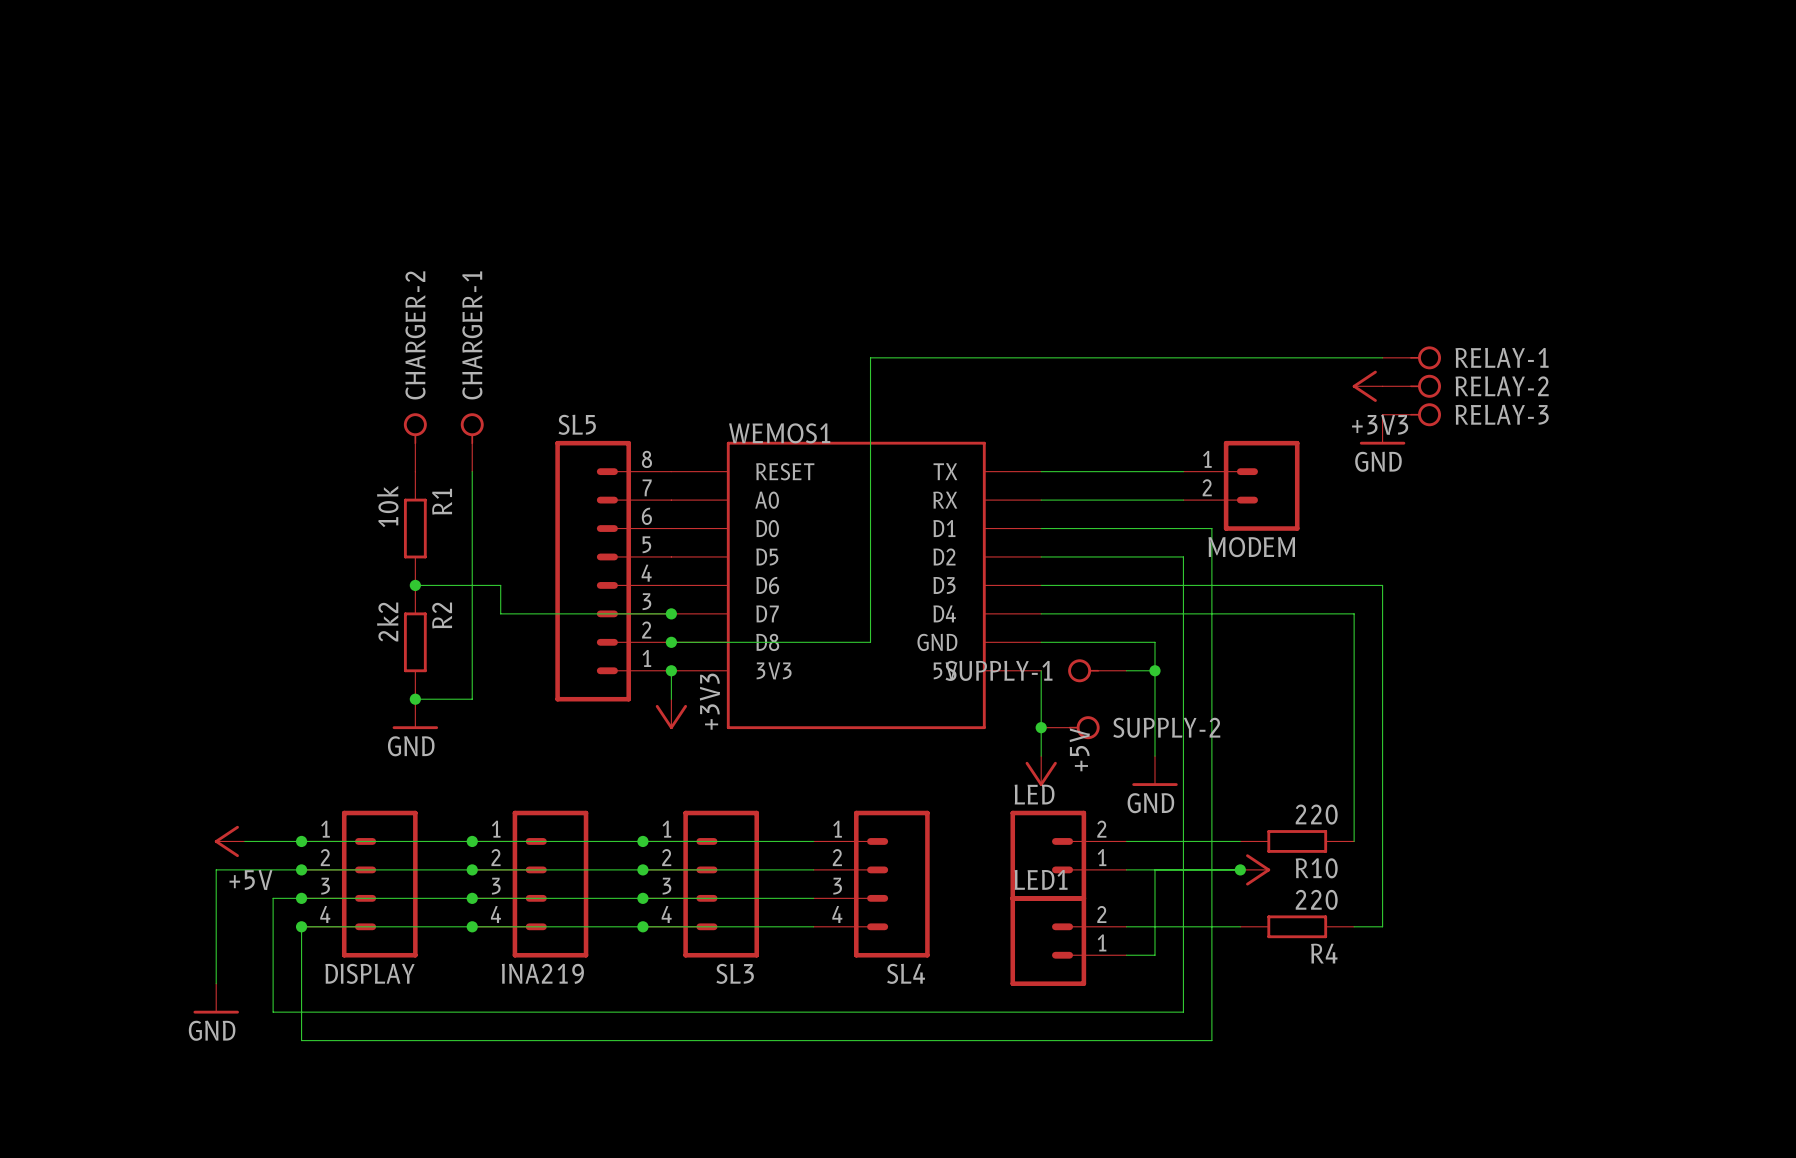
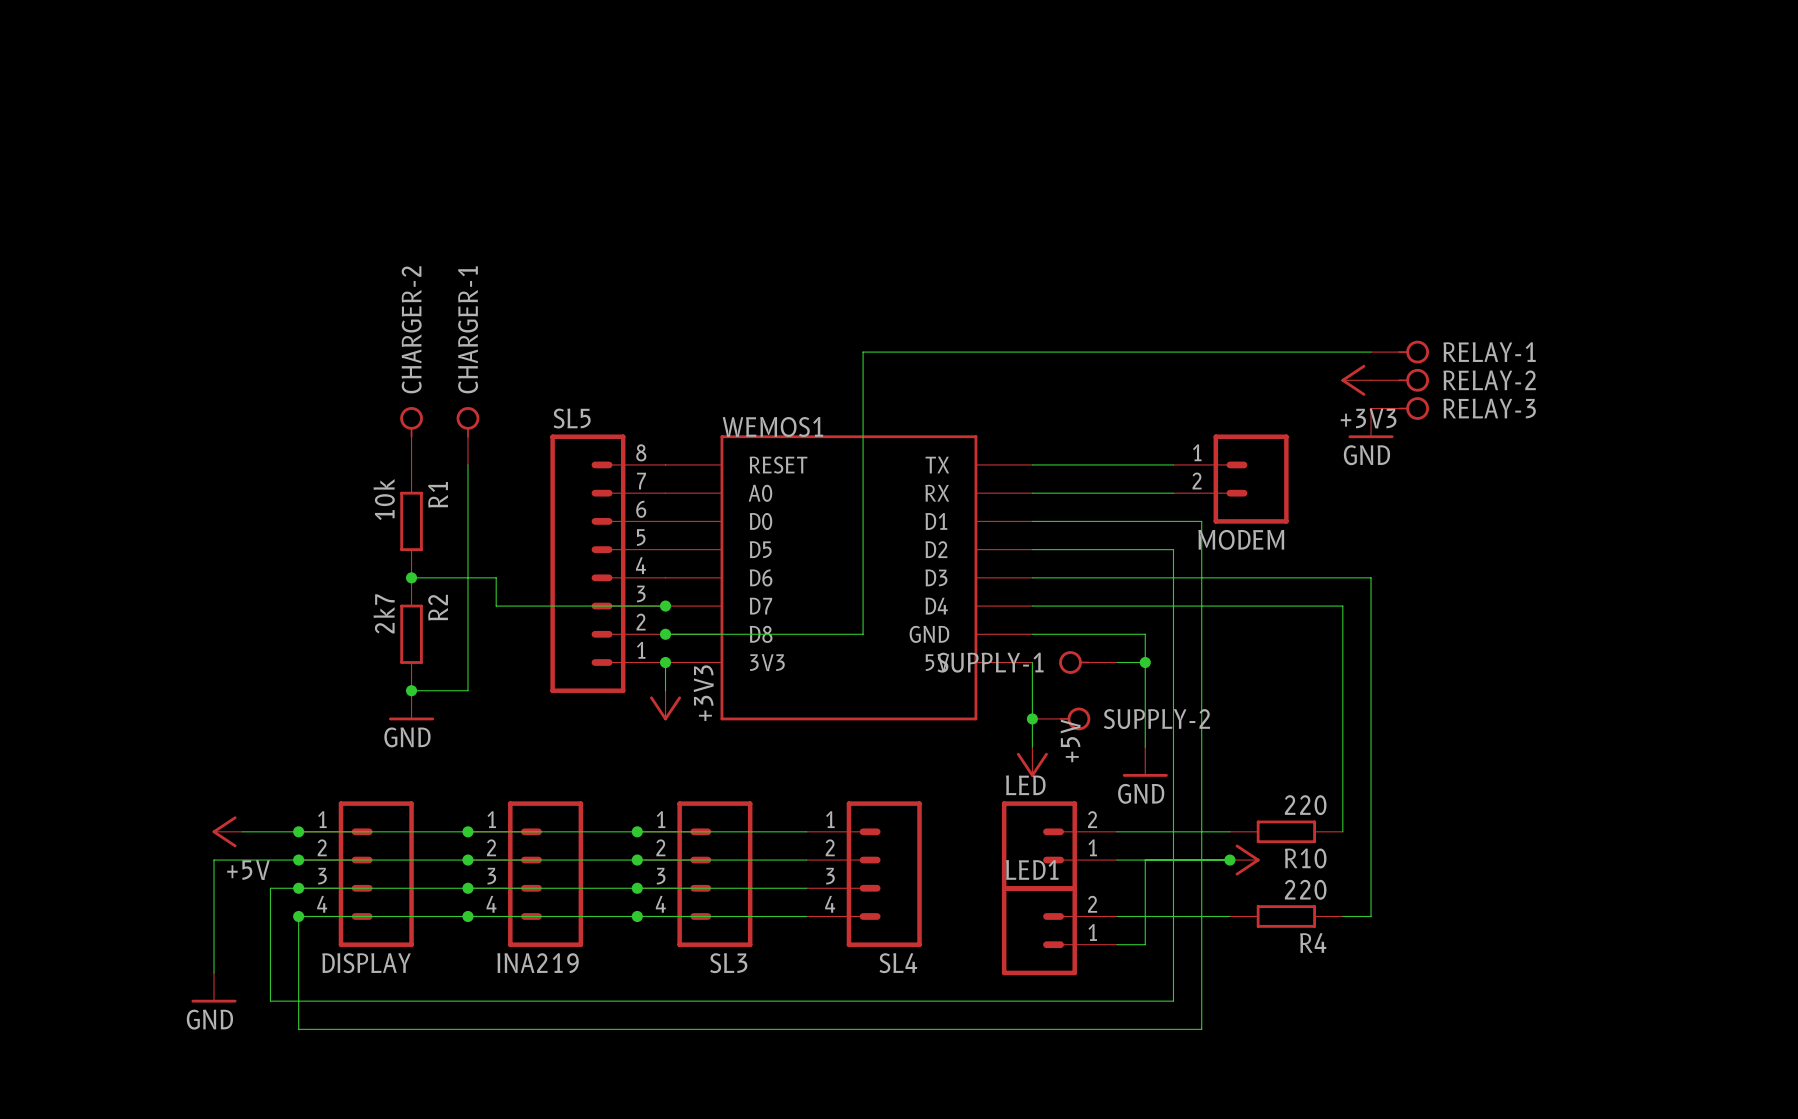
R2 value: 2k2 (387, 622) -> 2k7 (384, 613)

